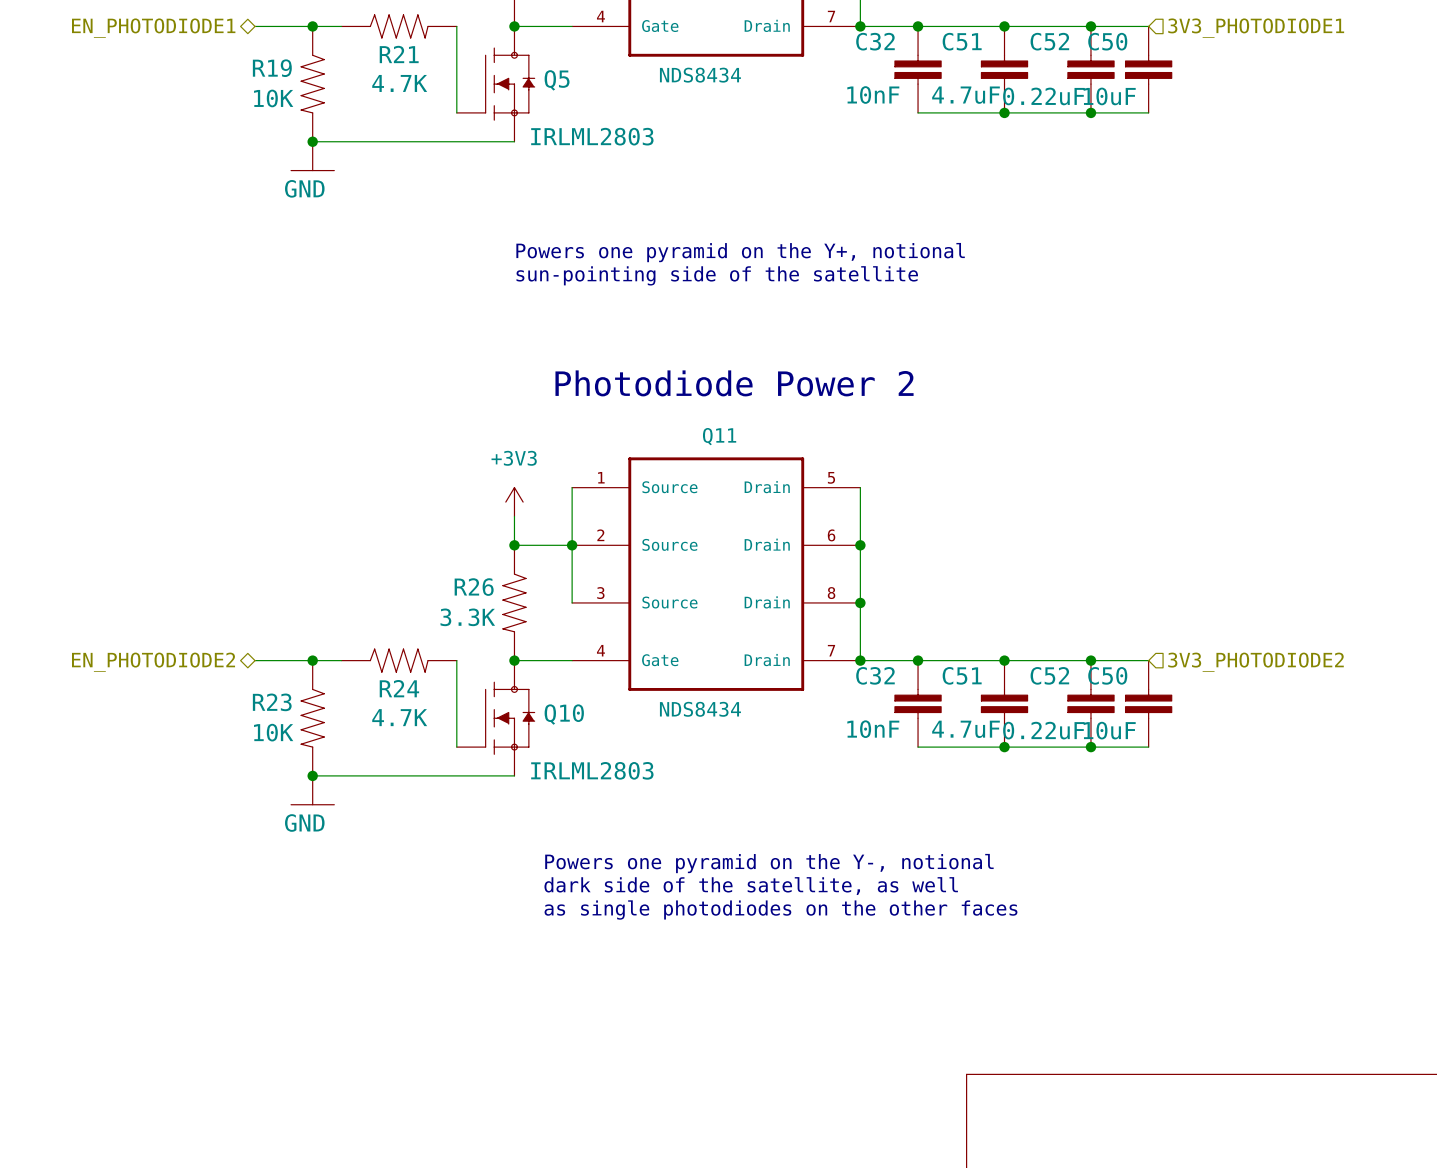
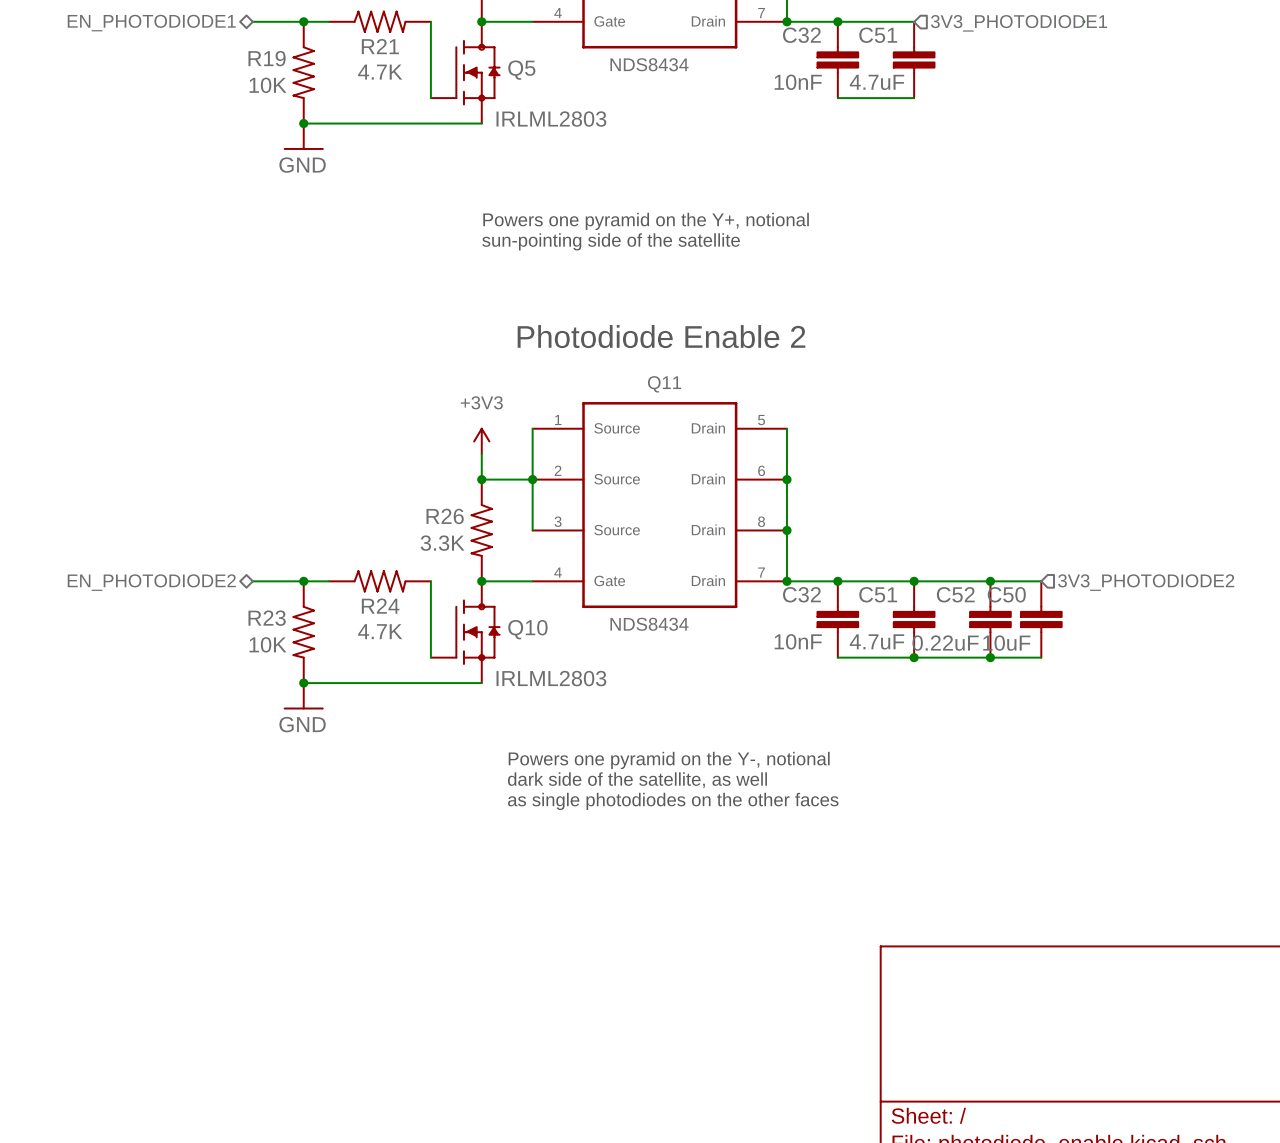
wire: (1004, 26) (1148, 26) -> none
junction: (1004, 26) -> none
junction: (1090, 26) -> none
wire: none -> (1083, 21) (1084, 21)
hierarchical label position: 3V3_PHOTODIODE1 (1256, 28) -> 3V3_PHOTODIODE1 (1019, 23)
C52: 0.22uF (1090, 69) -> none
C50: 10uF (1148, 69) -> none
wire: (1004, 112) (1148, 112) -> none
junction: (1004, 112) -> none
junction: (1090, 112) -> none
text: Photodiode Power 2 (734, 383) -> Photodiode Enable 2 (661, 336)

